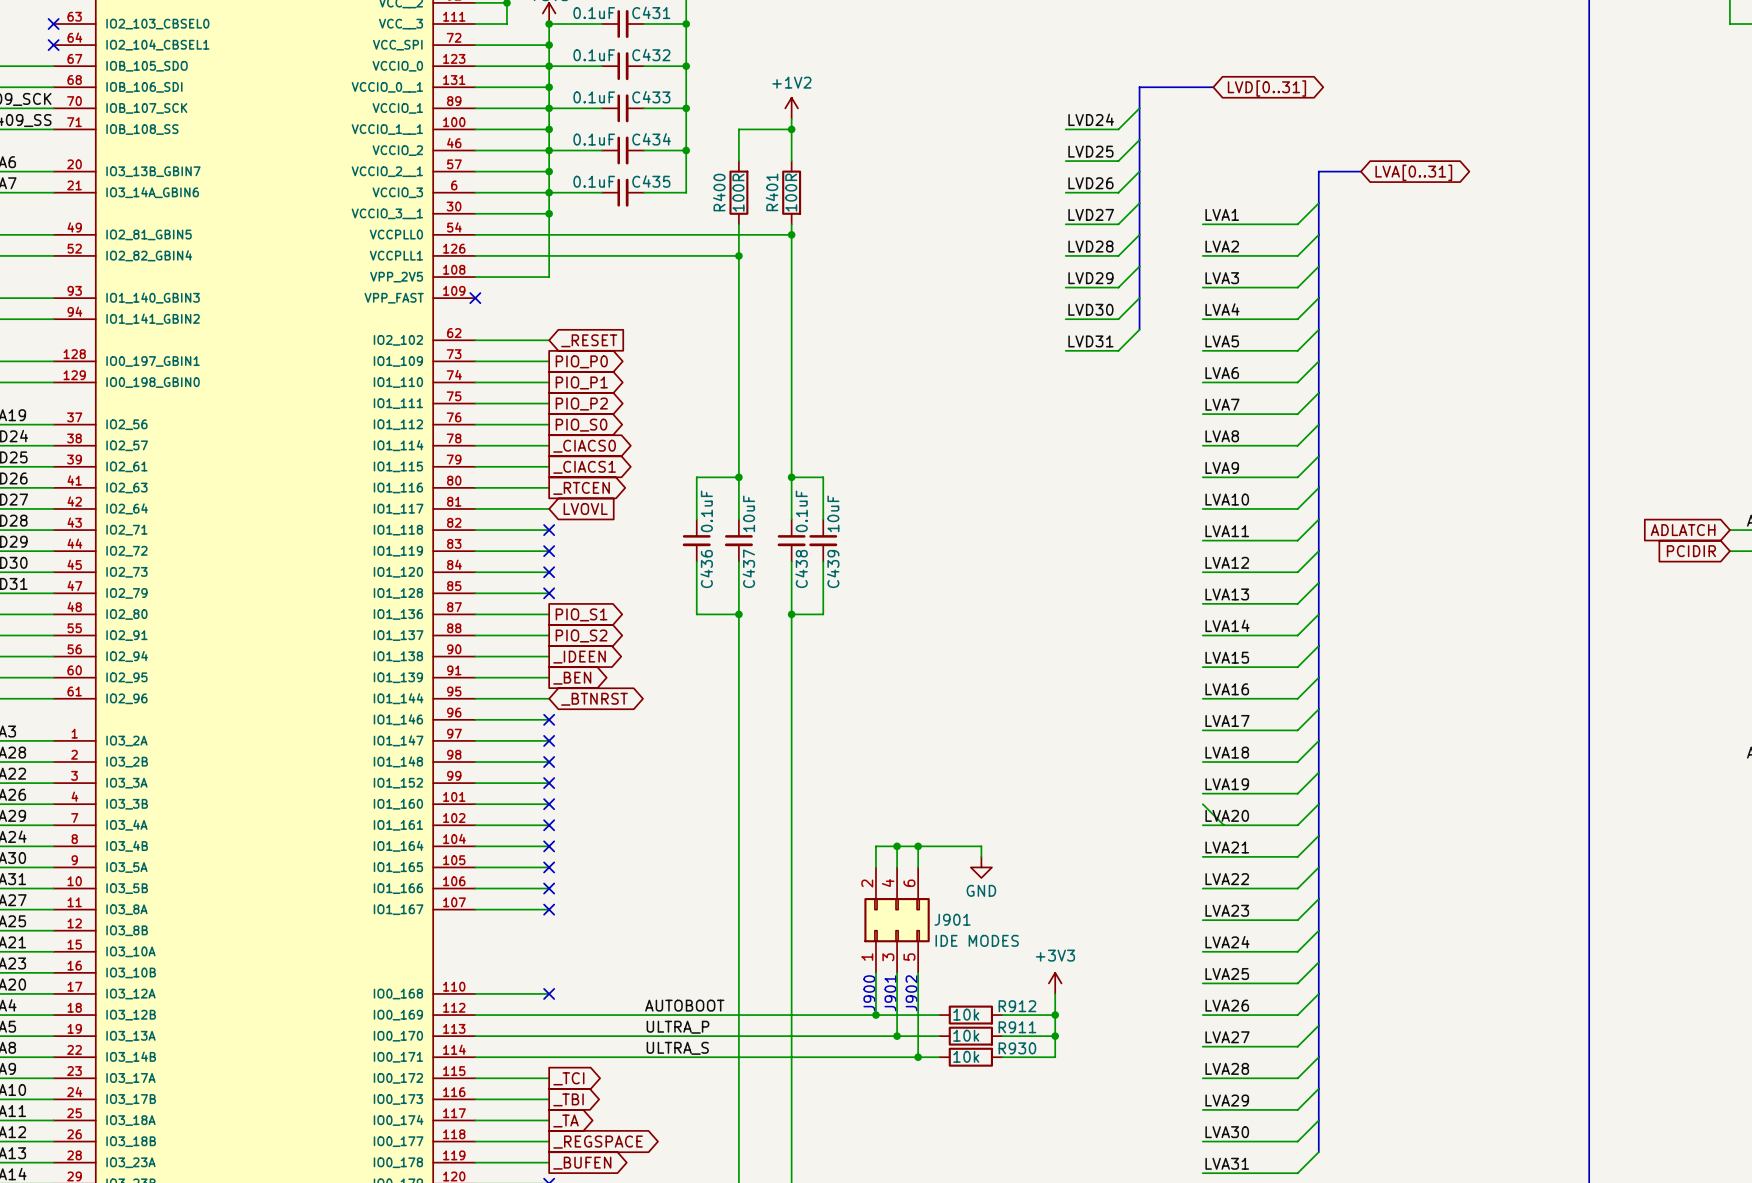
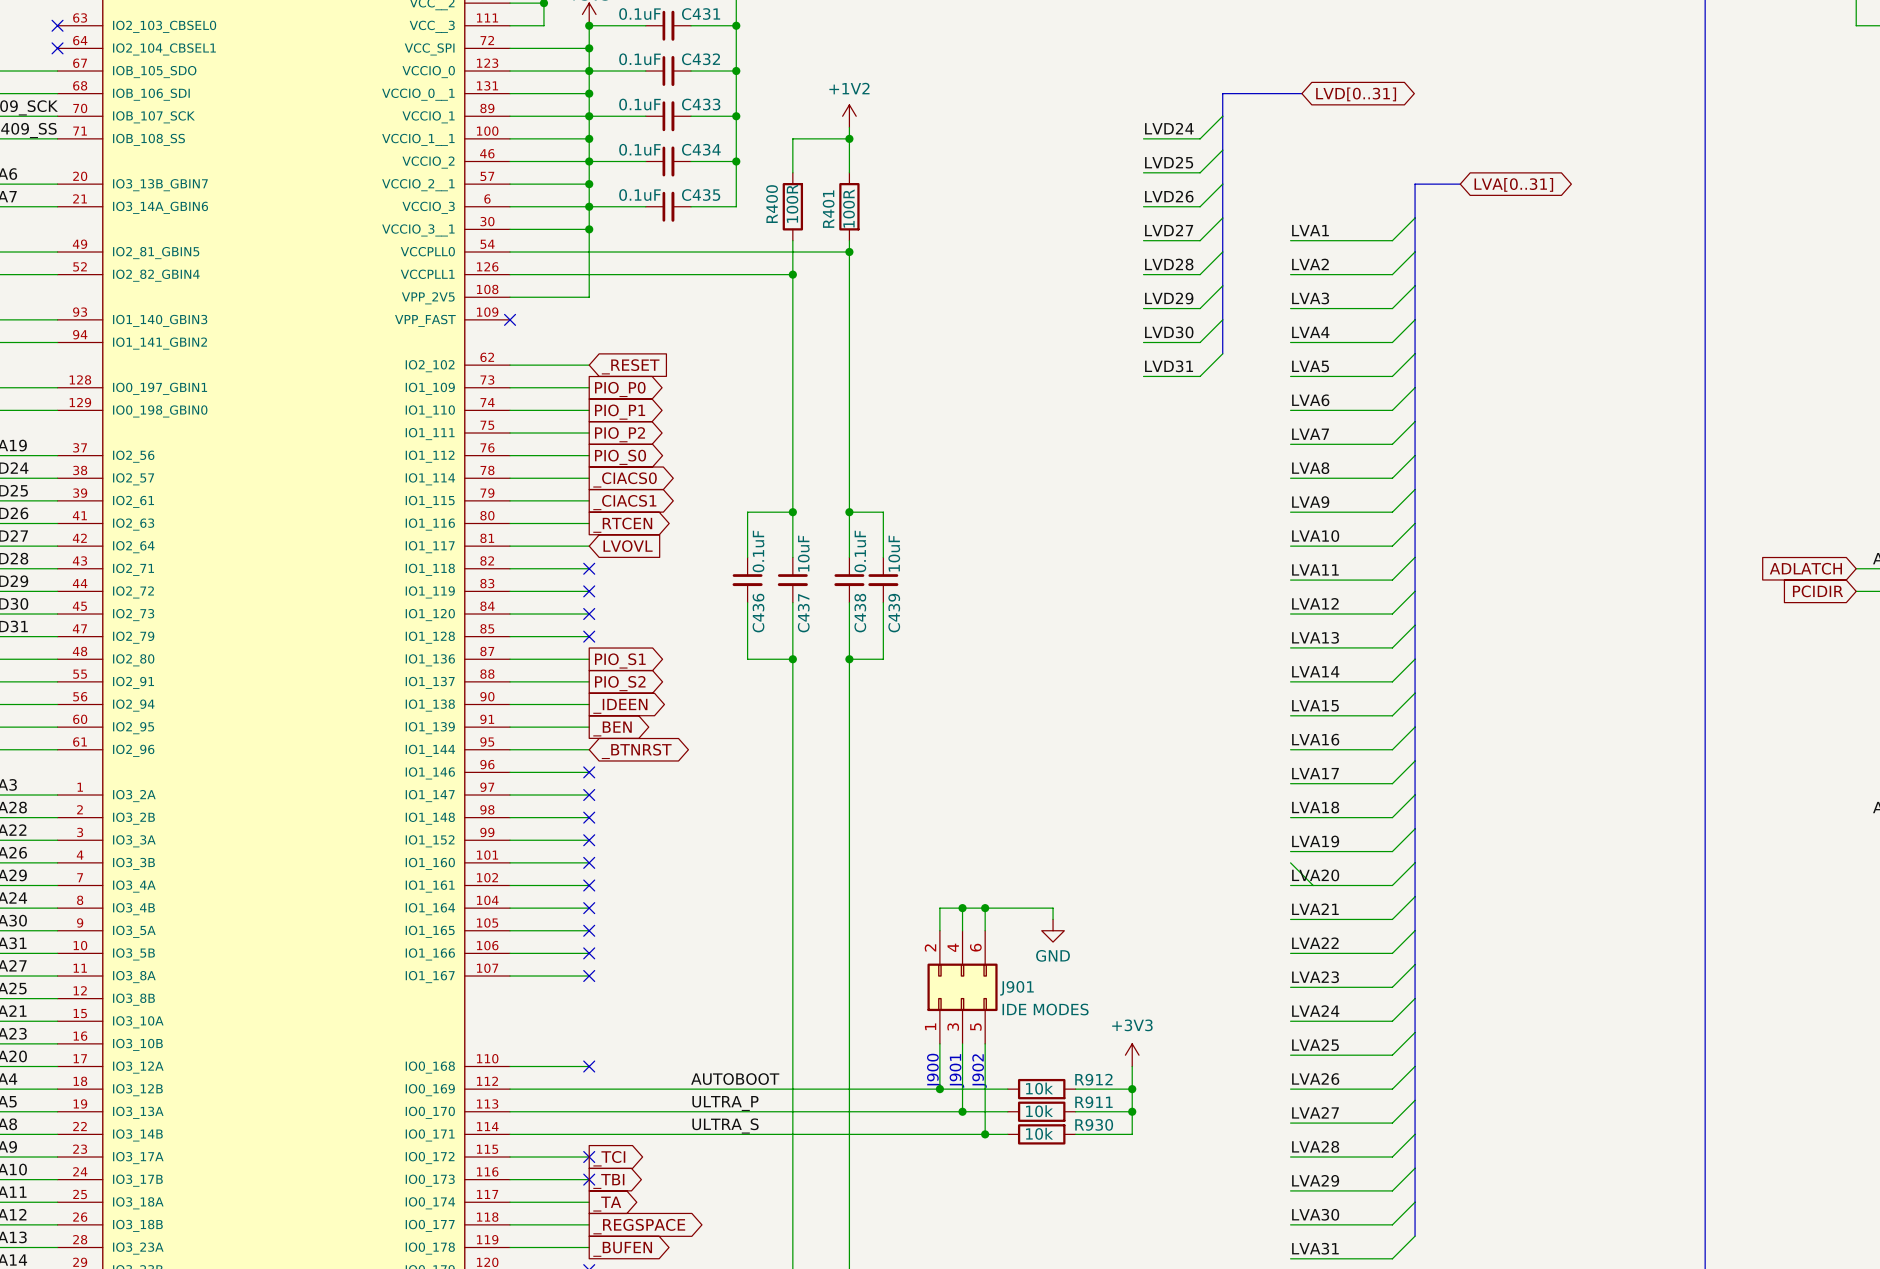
no-connect mark: none -> (589, 1157)
no-connect mark: none -> (589, 1179)

